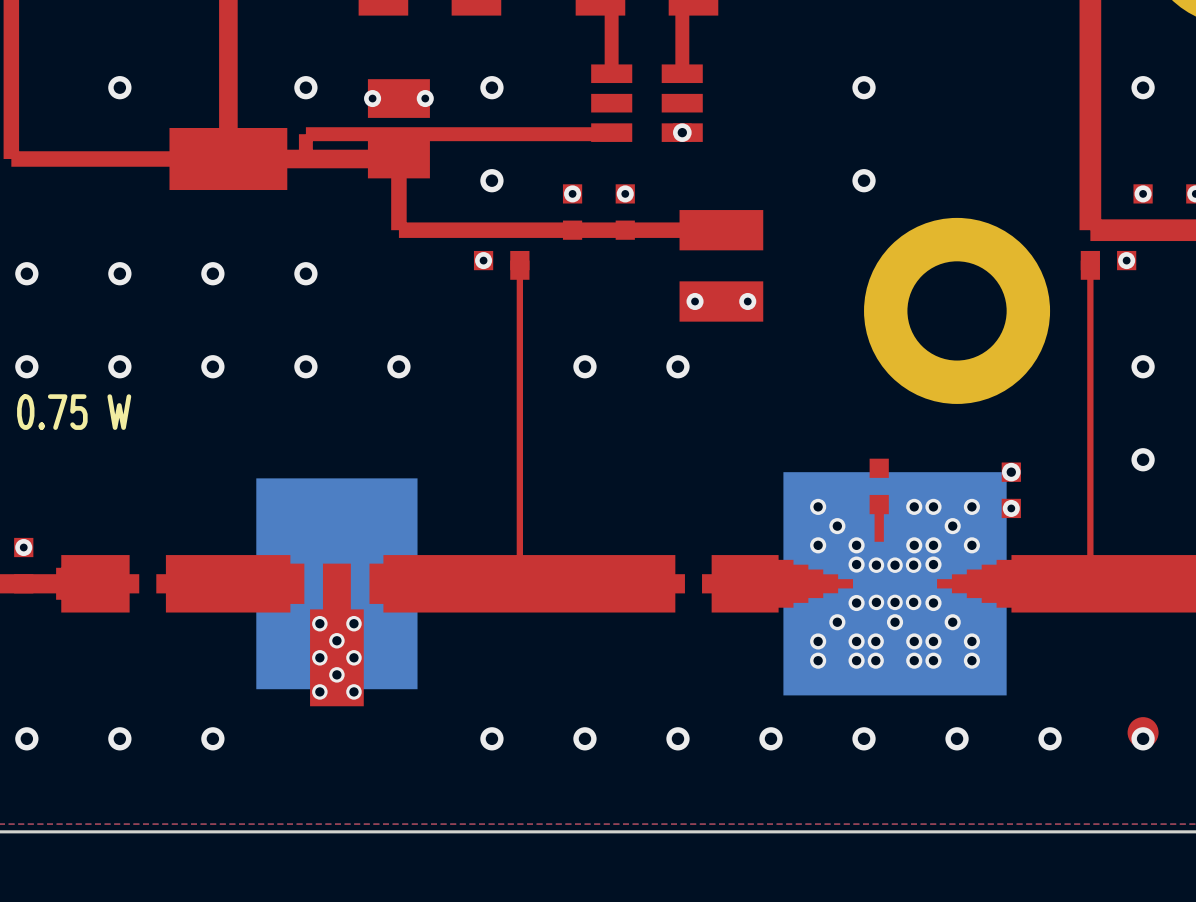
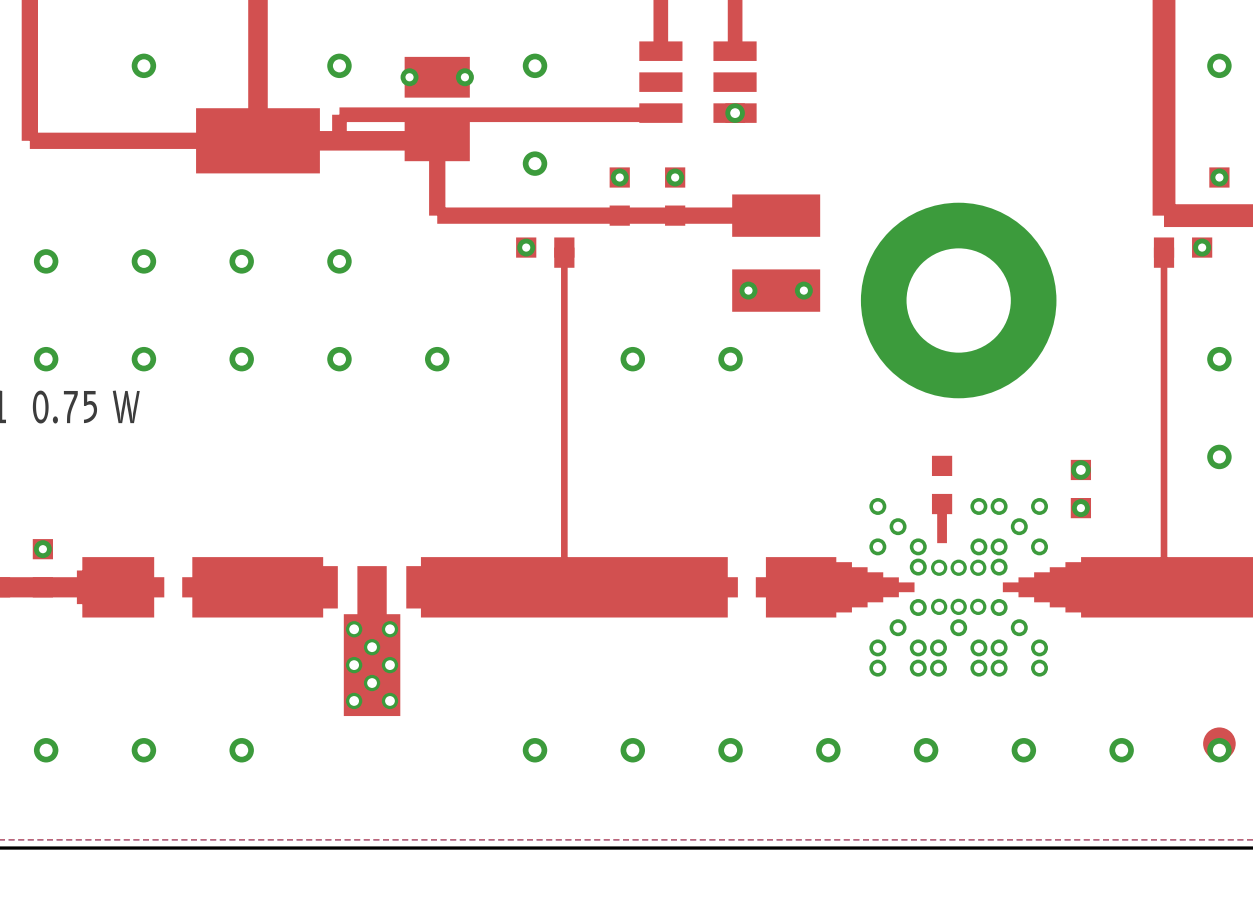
via: (864, 87) -> none
via: (864, 180) -> none
part position: (957, 310) -> (958, 300)
part: (336, 583) -> none
part: (895, 583) -> none

